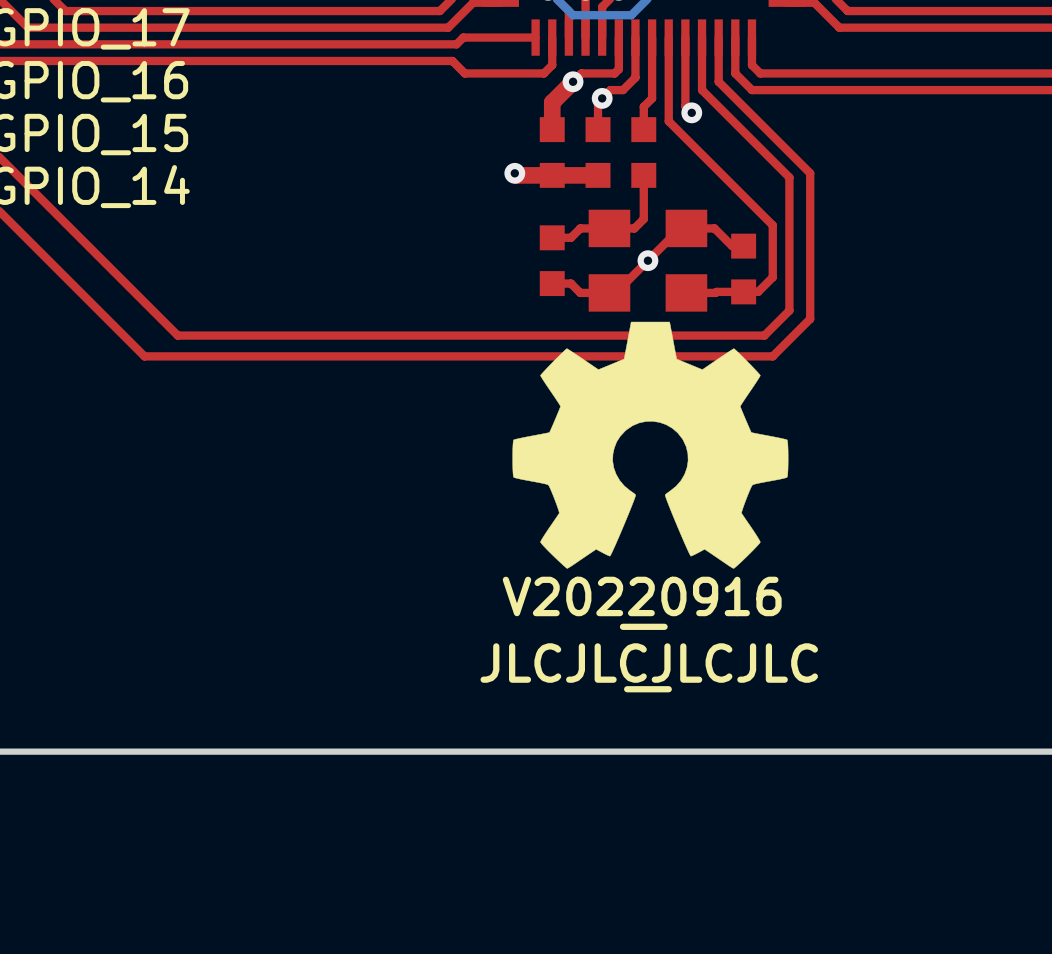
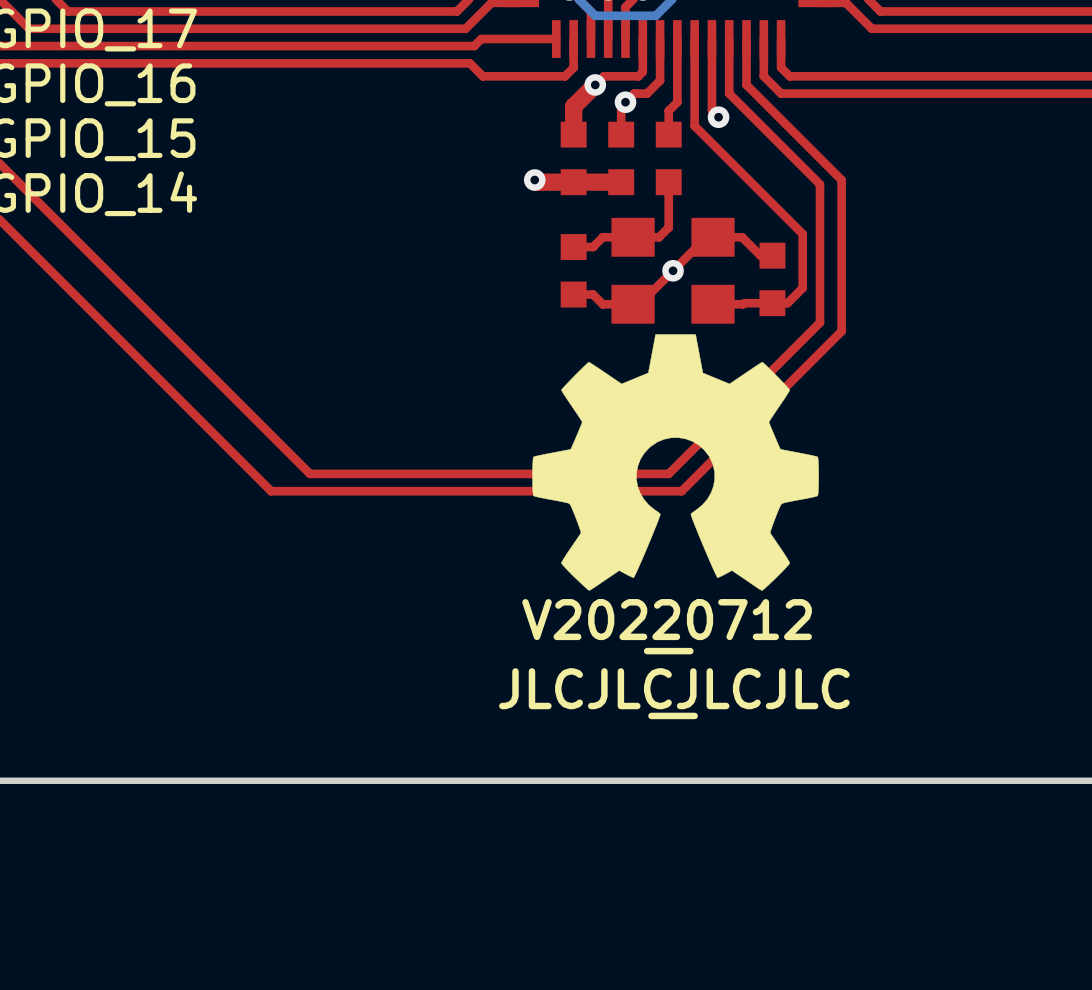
top track: (764, 335) (177, 335) -> (794, 348) (668, 473) (310, 473) (184, 348)
top track: (772, 356) (144, 356) -> (802, 370) (681, 491) (271, 491) (150, 370)
drawing shape: [502, 576, 782, 630] -> [522, 599, 812, 655]

